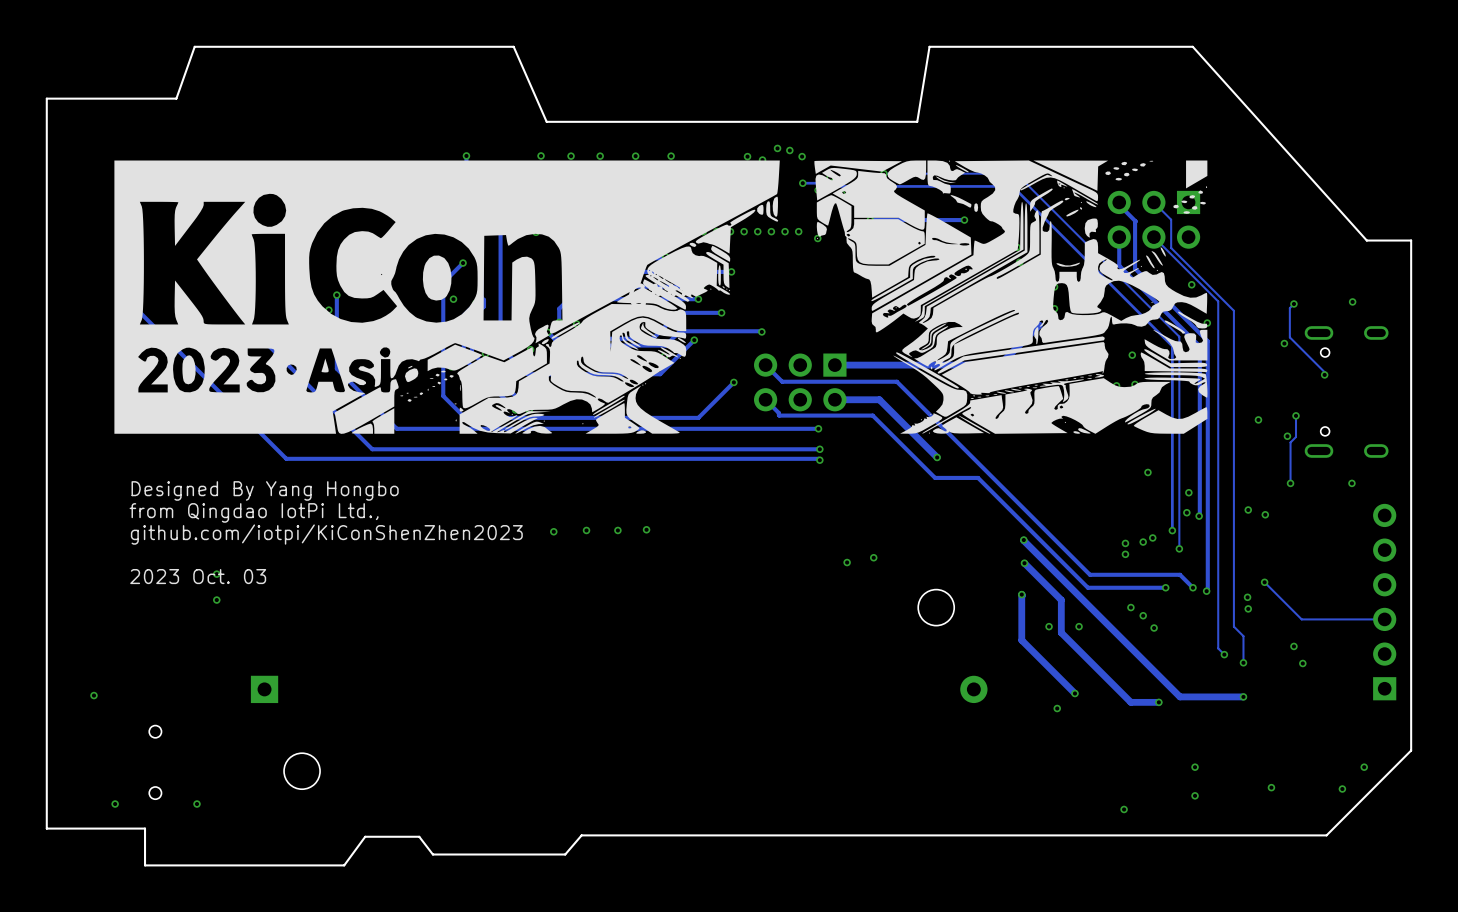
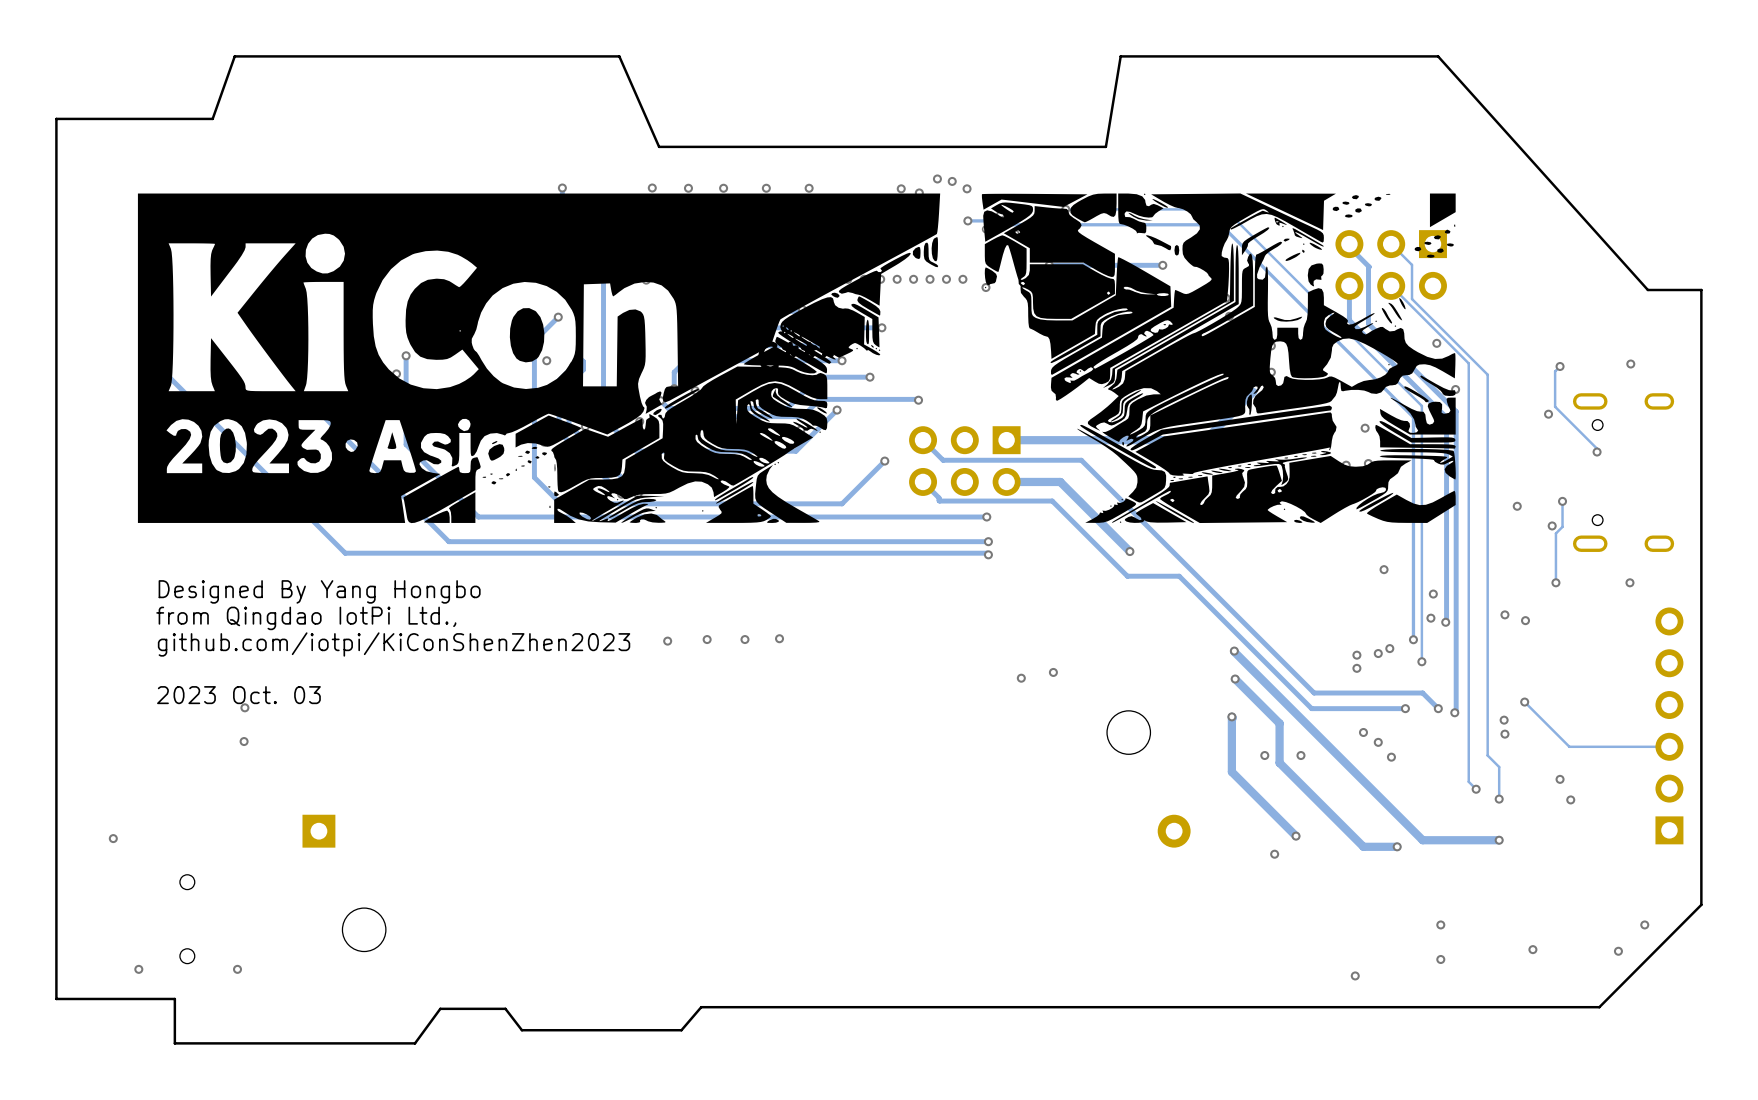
via: (216, 574) -> none
via: none -> (244, 707)
via: (216, 600) -> none
via: none -> (244, 741)

